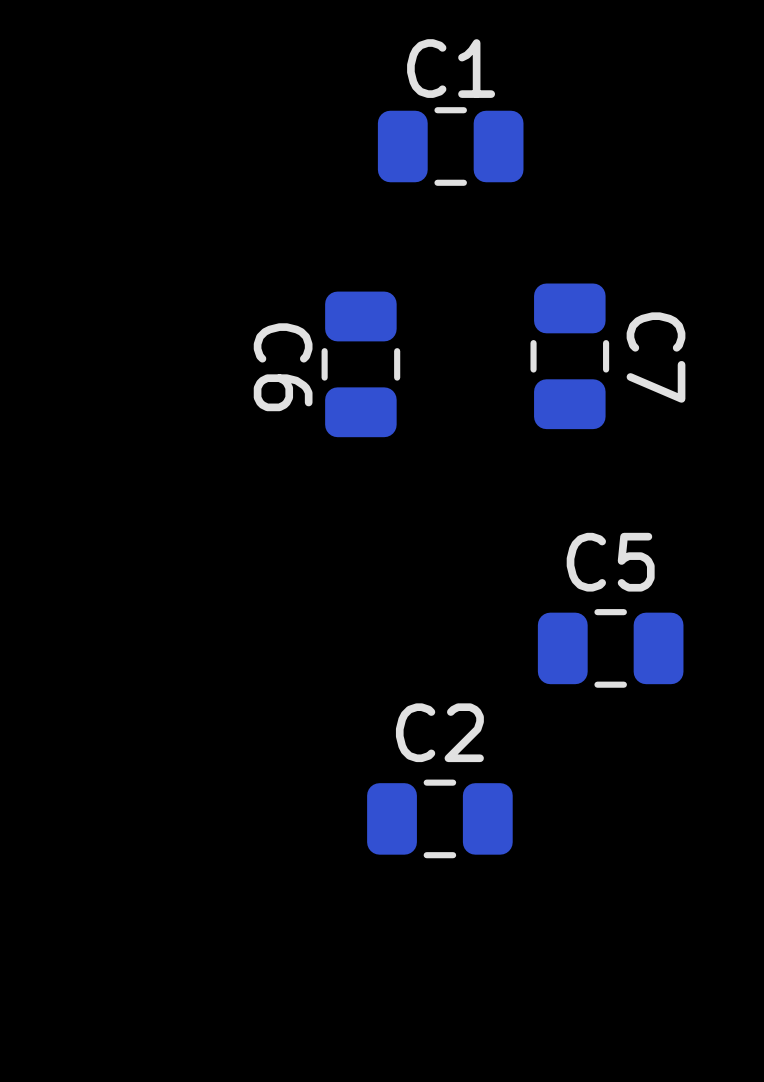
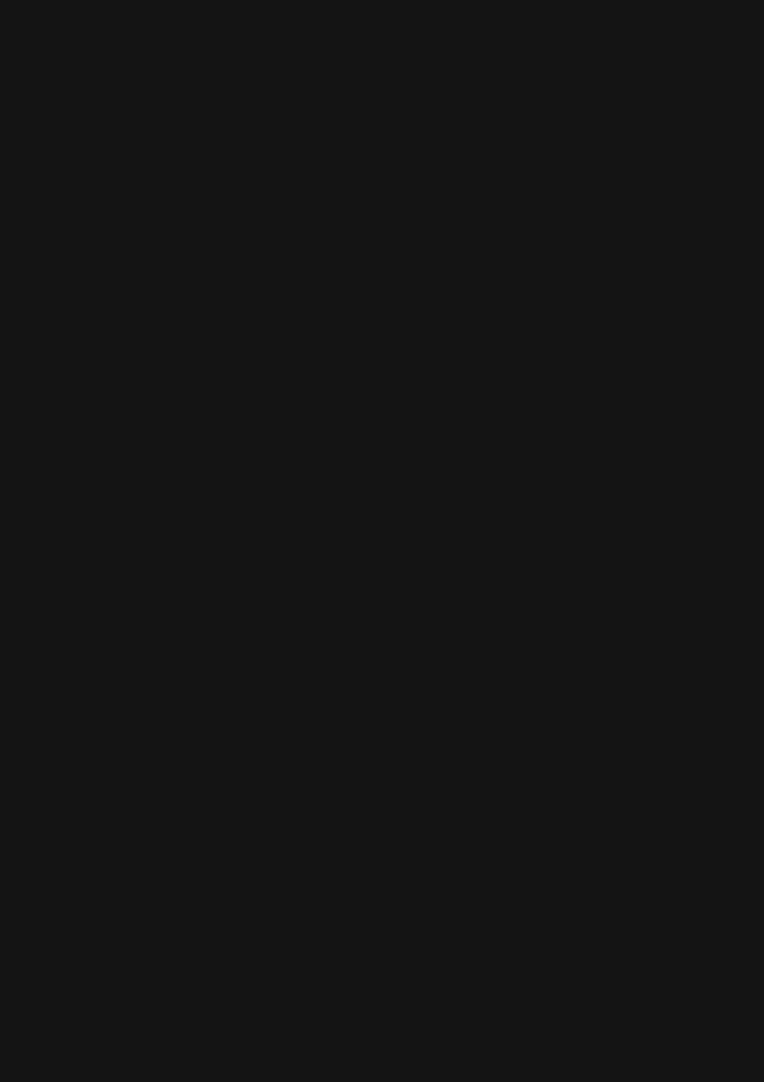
C1: (450, 146) -> none
C7: (569, 356) -> none
C6: (360, 364) -> none
C5: (610, 648) -> none
C2: (439, 818) -> none

